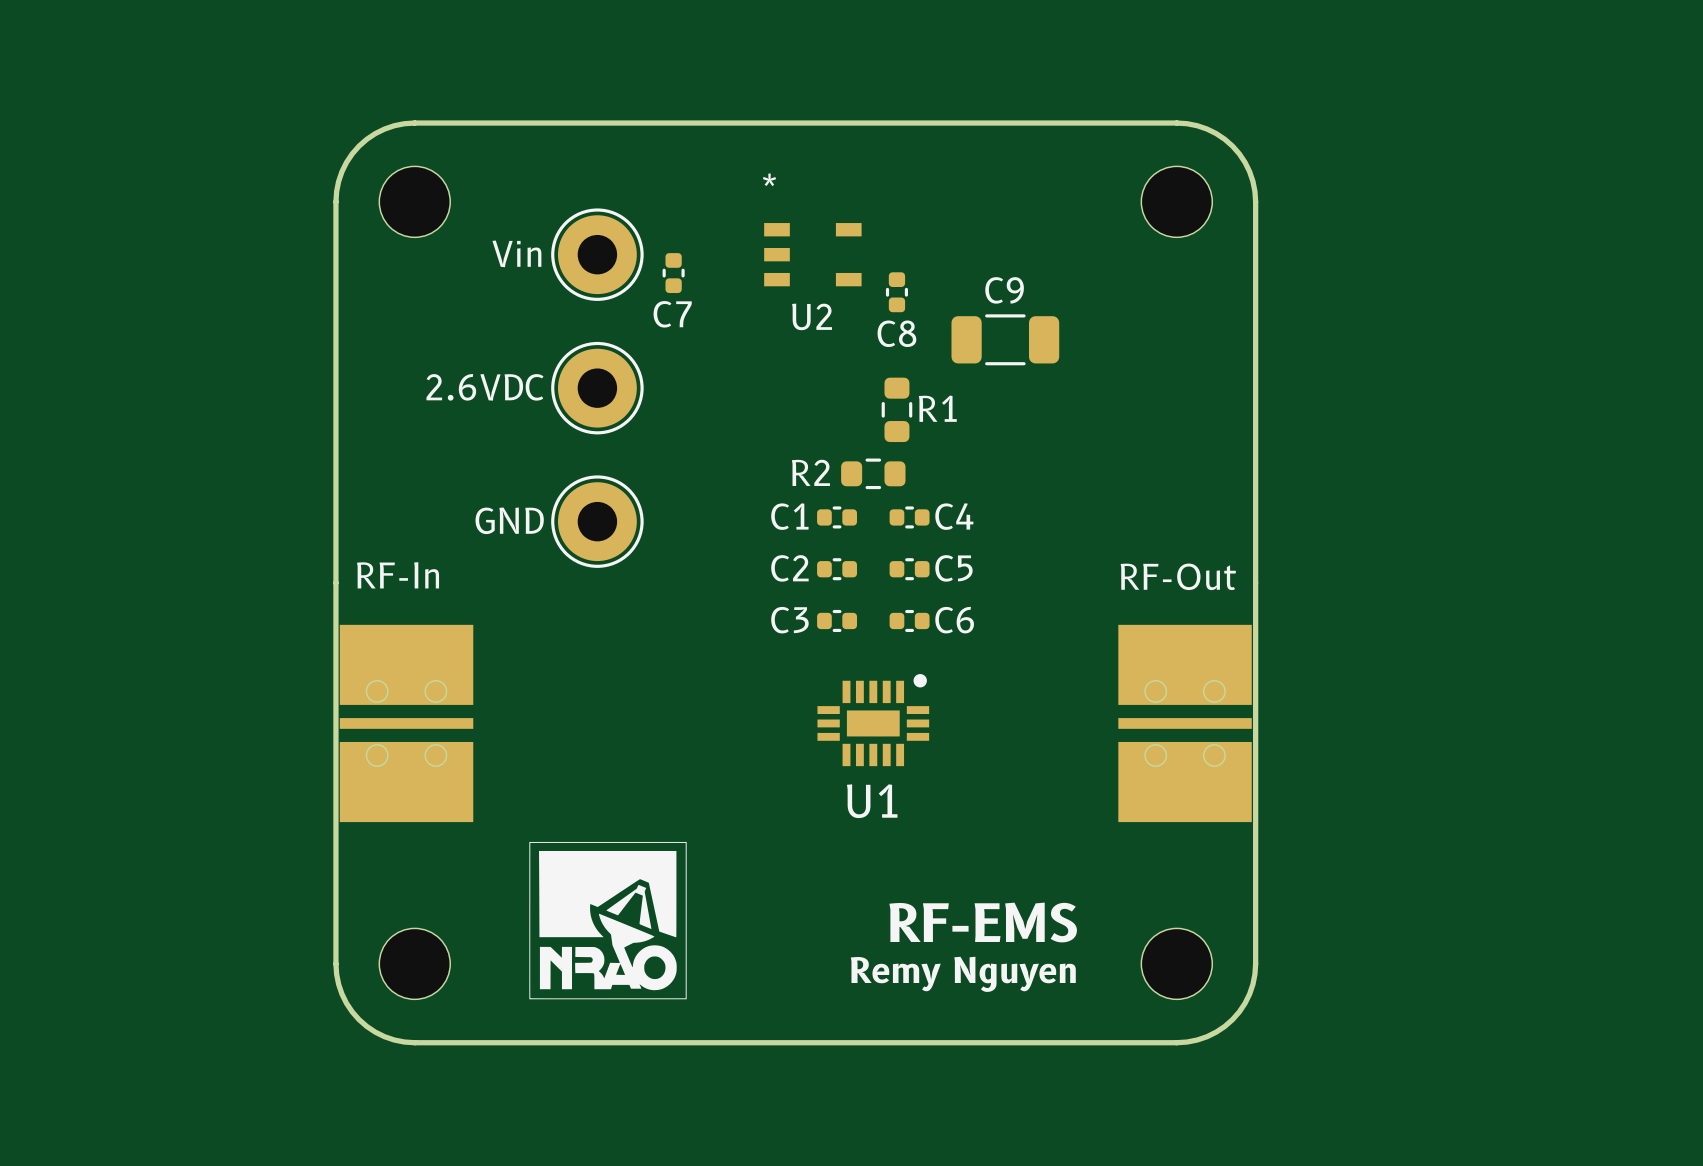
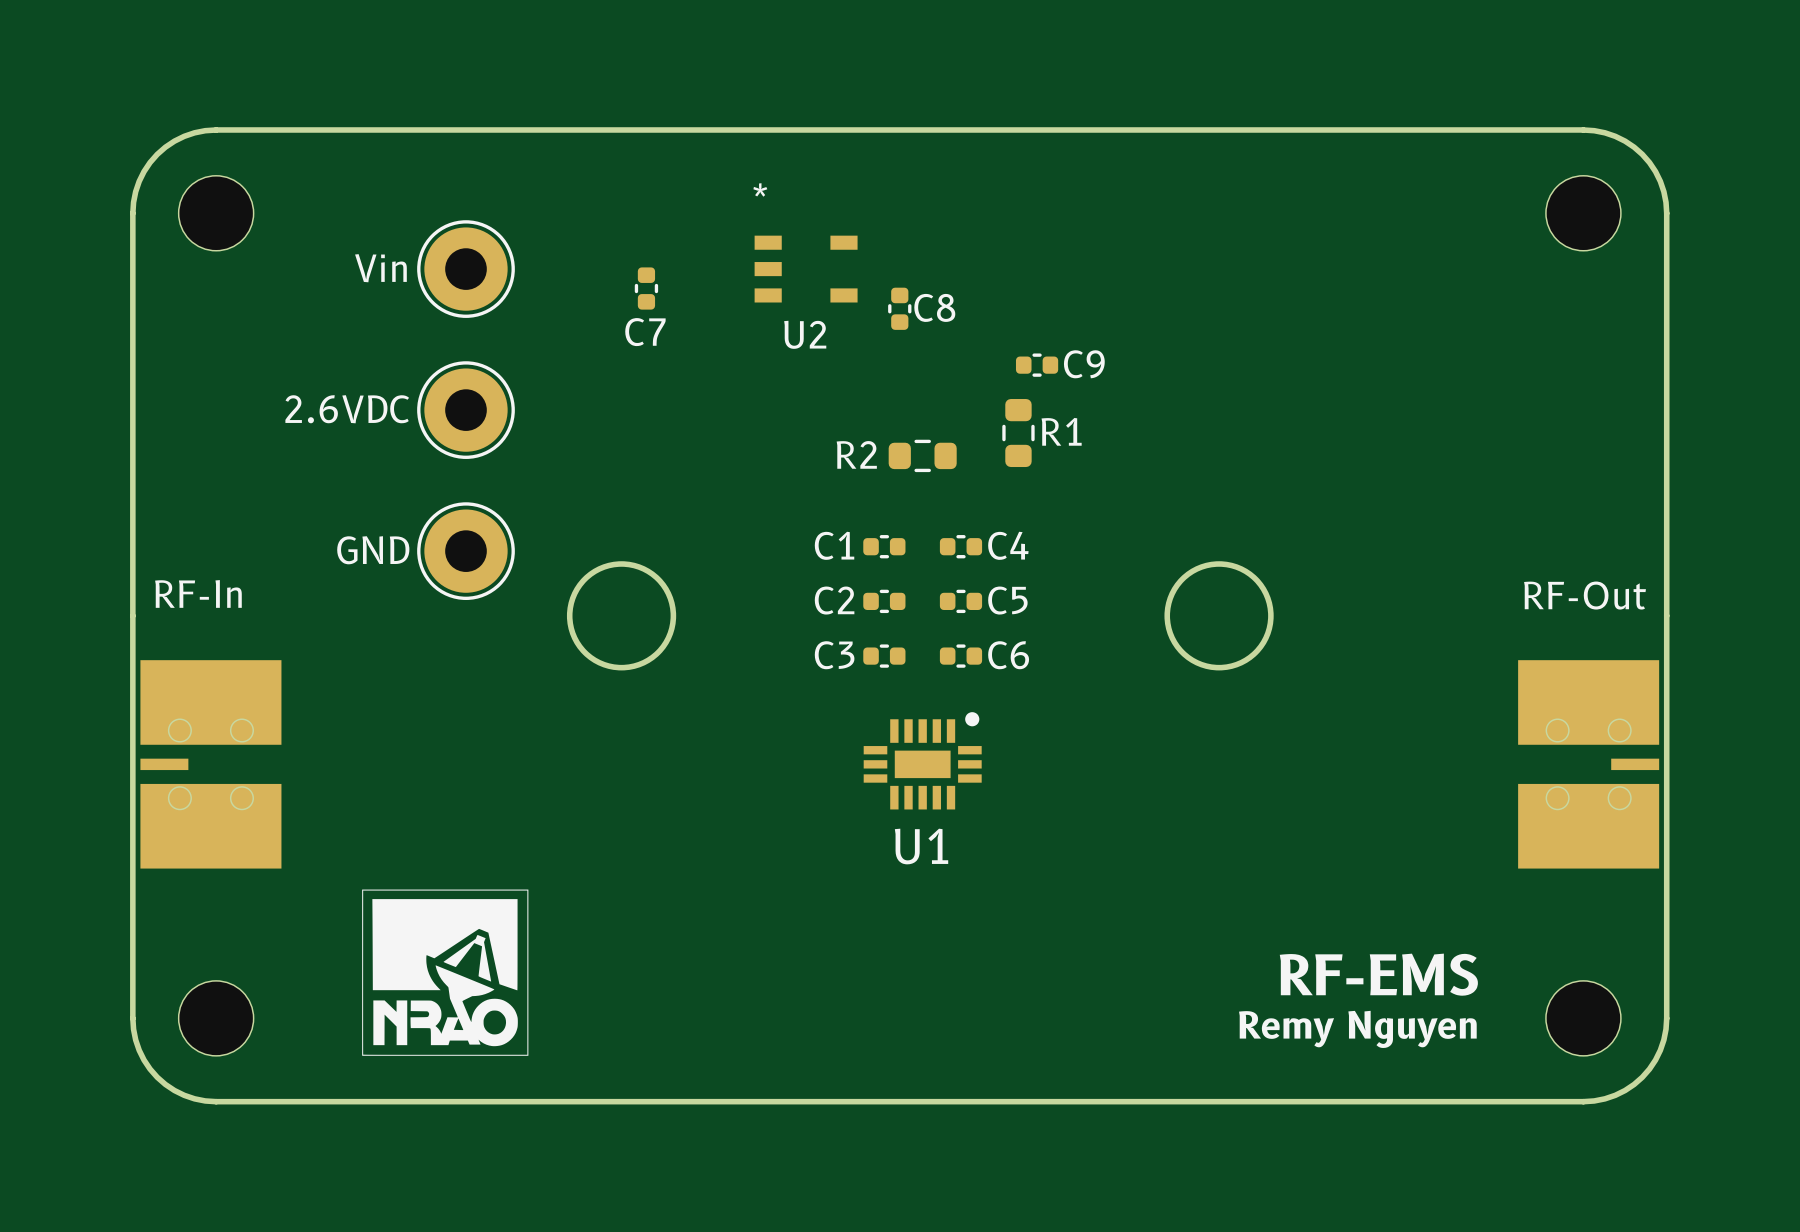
board edge: (414, 123) (394, 125) (366, 139) (346, 162) (336, 191) (335, 963) (341, 994) (359, 1019) (384, 1036) (414, 1042) -> (438, 129) (205, 130) (184, 136) (165, 147) (150, 162) (139, 181) (132, 213) (132, 1018) (135, 1039) (150, 1069) (174, 1090) (194, 1098) (216, 1101) (438, 1101)
board edge: (1176, 123) (1206, 129) (1232, 146) (1249, 171) (1255, 201) (1254, 974) (1249, 994) (1232, 1019) (1206, 1036) (1176, 1042) -> (1243, 129) (1594, 130) (1625, 141) (1642, 154) (1660, 181) (1666, 213) (1666, 1018) (1660, 1050) (1649, 1069) (1634, 1084) (1615, 1095) (1594, 1100) (1243, 1101)
part position: (414, 201) -> (216, 213)
part position: (1176, 201) -> (1583, 213)
Vin position: (597, 254) -> (465, 269)
U2 position: (812, 254) -> (806, 269)
C7 position: (673, 273) -> (646, 288)
C9 name position: C9 (1004, 290) -> C9 (1084, 364)
C8 position: (896, 292) -> (899, 308)
C9 footprint: [951, 314, 1060, 366] -> [1015, 353, 1059, 377]
C8 name position: C8 (896, 333) -> C8 (934, 307)
2.6VDC position: (597, 388) -> (465, 410)
R1 position: (896, 409) -> (1018, 433)
R2 position: (873, 473) -> (922, 455)
GND position: (597, 521) -> (465, 551)
round board edge: none -> [566, 561, 677, 671]
round board edge: none -> [1164, 561, 1274, 671]
RF-In: none -> (210, 764)
RF-In: (406, 723) -> none
RF-Out: (1185, 723) -> none
RF-Out: none -> (1588, 764)
drawing position: (608, 920) -> (445, 972)
text position: RF-EMS (983, 922) -> RF-EMS (1378, 974)
part position: (414, 963) -> (216, 1018)
part position: (1176, 963) -> (1583, 1018)
text position: Remy Nguyen (963, 974) -> Remy Nguyen (1357, 1029)

